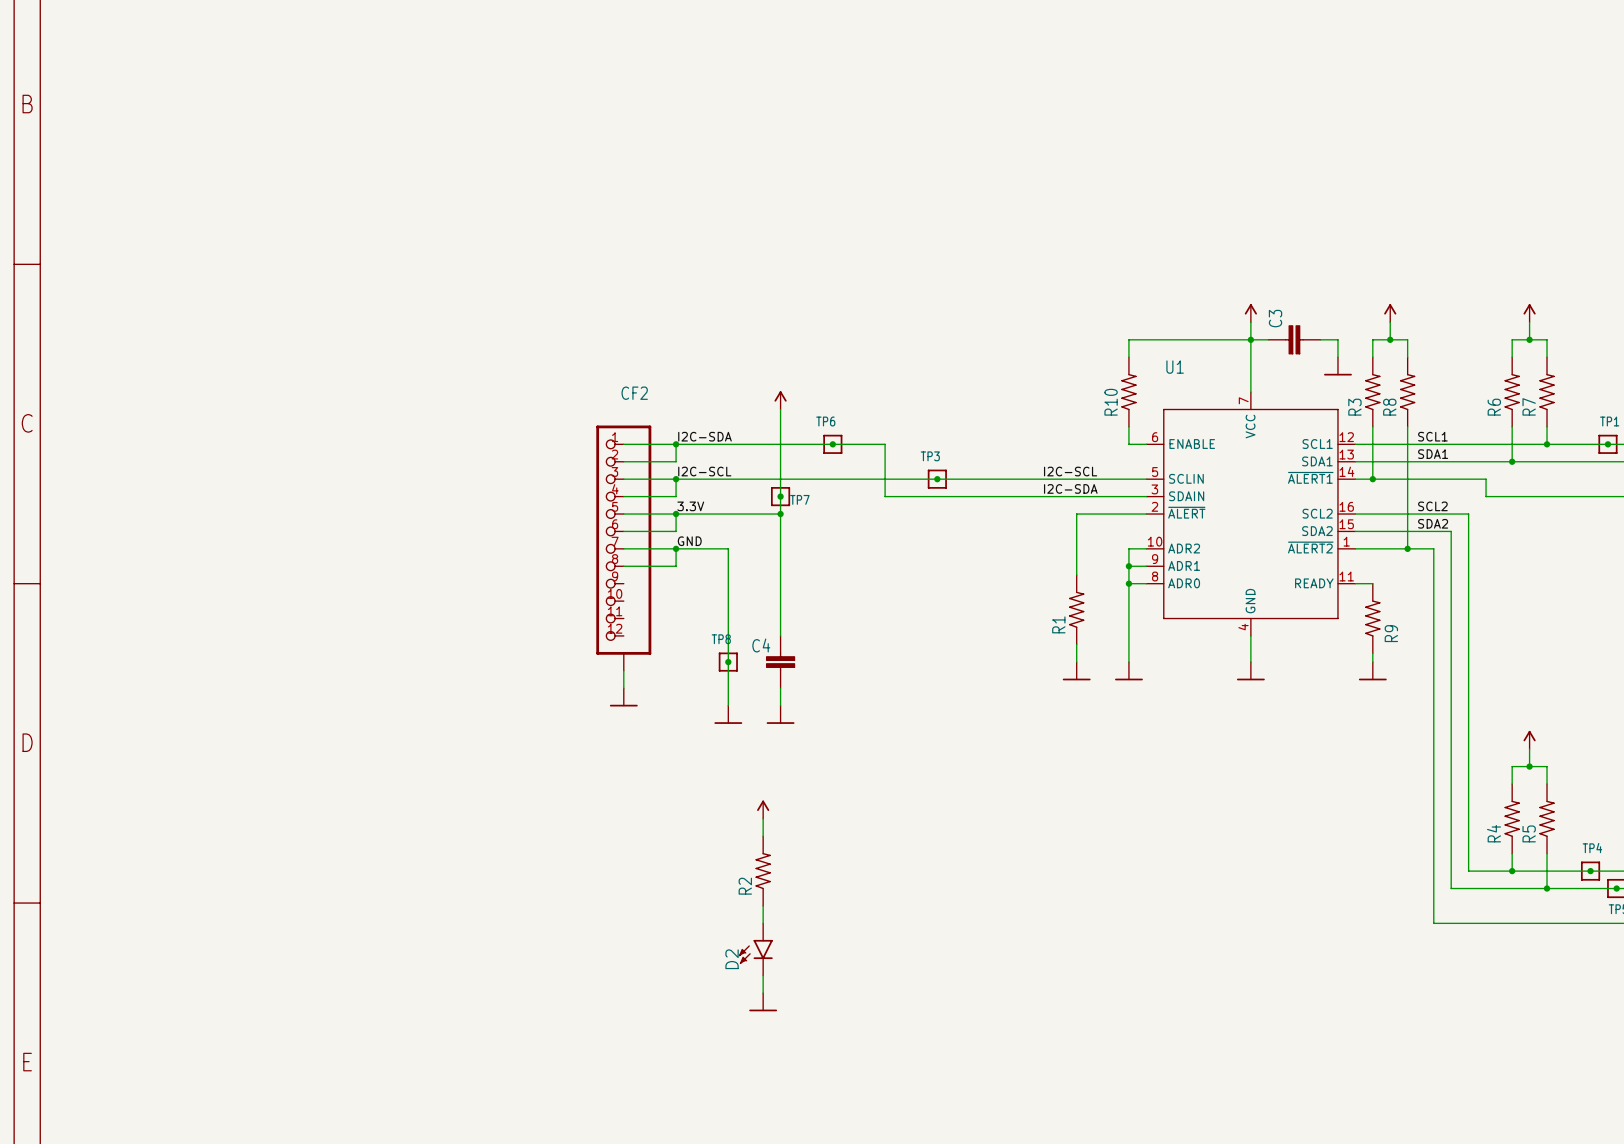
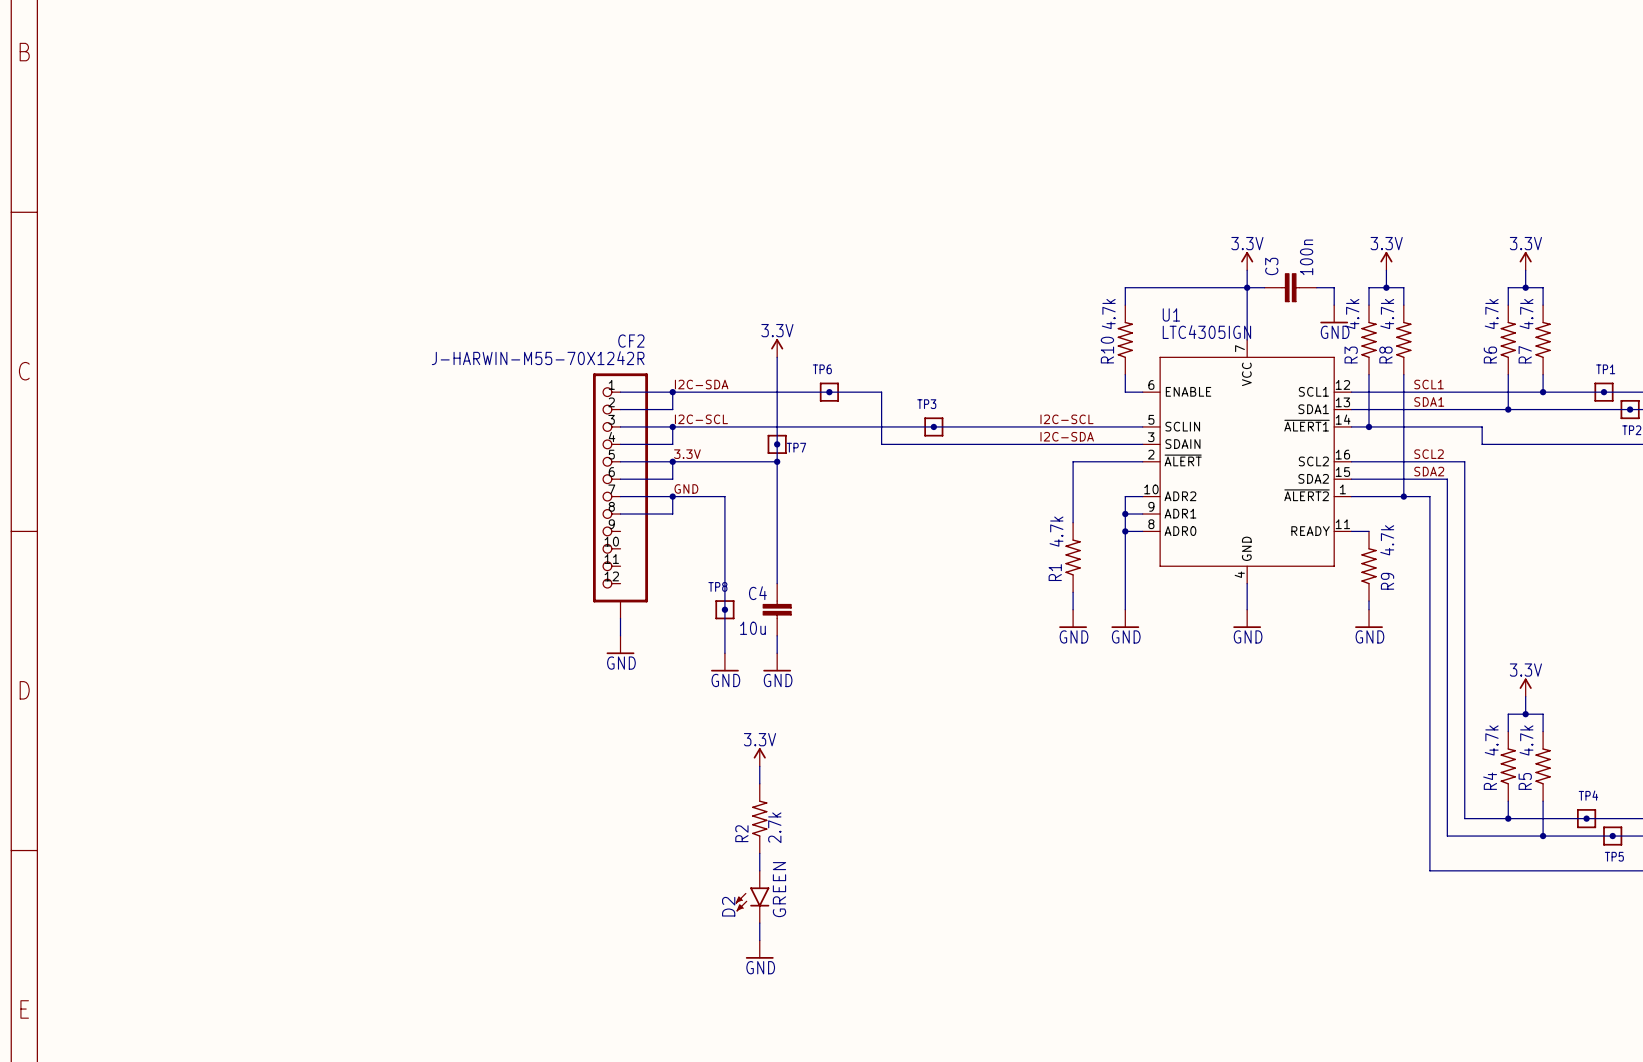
power symbol text: none -> 3.3V (1247, 243)
power symbol text: none -> 3.3V (1386, 243)
power symbol text: none -> 3.3V (1525, 243)
C3 value: none -> 100n (1306, 257)
R10 value: none -> 4.7k (1108, 314)
R3 value: none -> 4.7k (1352, 314)
R8 value: none -> 4.7k (1387, 314)
R6 value: none -> 4.7k (1491, 314)
R7 value: none -> 4.7k (1526, 314)
power symbol text: none -> 3.3V (777, 330)
U1 value: none -> LTC4305IGN (1206, 332)
power symbol text: none -> GND (1335, 332)
CF2 value: none -> J-HARWIN-M55-70X1242R (538, 358)
R1 value: none -> 4.7k (1056, 531)
R9 value: none -> 4.7k (1387, 540)
C4 value: none -> 10u (752, 628)
power symbol text: none -> GND (1074, 636)
power symbol text: none -> GND (1126, 636)
power symbol text: none -> GND (1248, 636)
power symbol text: none -> GND (1369, 636)
power symbol text: none -> GND (621, 663)
power symbol text: none -> 3.3V (1525, 670)
power symbol text: none -> GND (725, 680)
power symbol text: none -> GND (778, 680)
power symbol text: none -> 3.3V (760, 739)
R4 value: none -> 4.7k (1491, 740)
R5 value: none -> 4.7k (1526, 740)
R2 value: none -> 2.7k (774, 827)
D2 value: none -> GREEN (779, 889)
power symbol text: none -> GND (760, 967)

